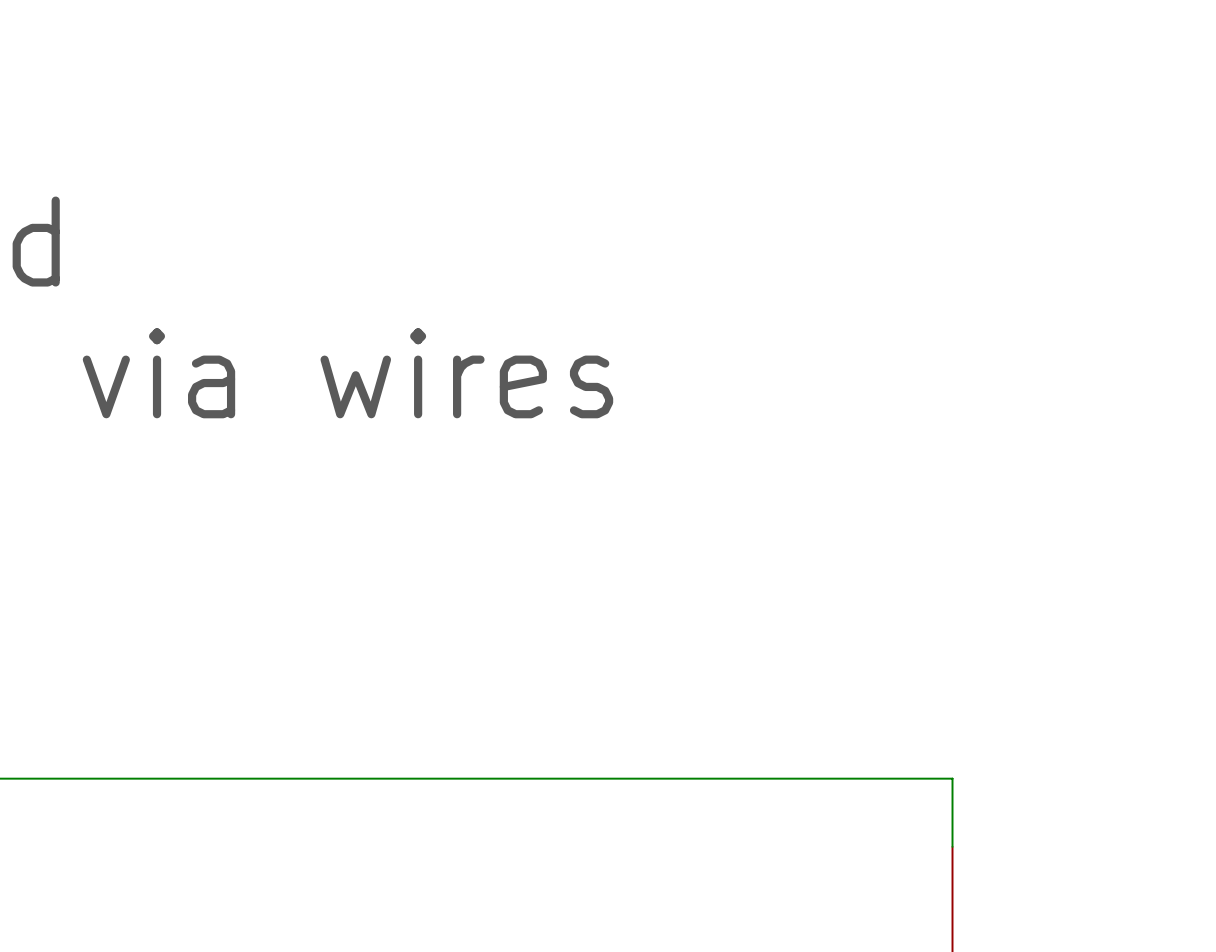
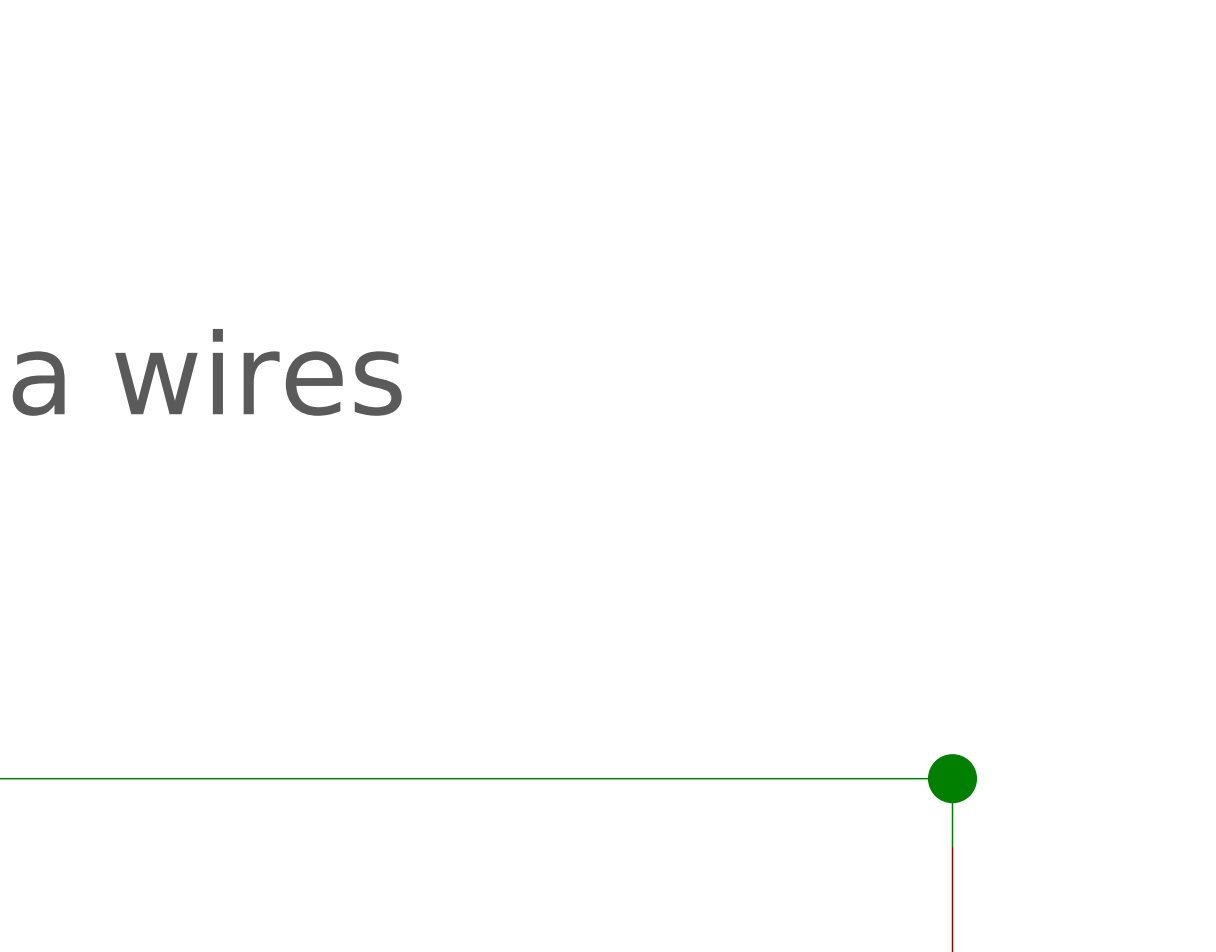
junction: none -> (952, 778)

